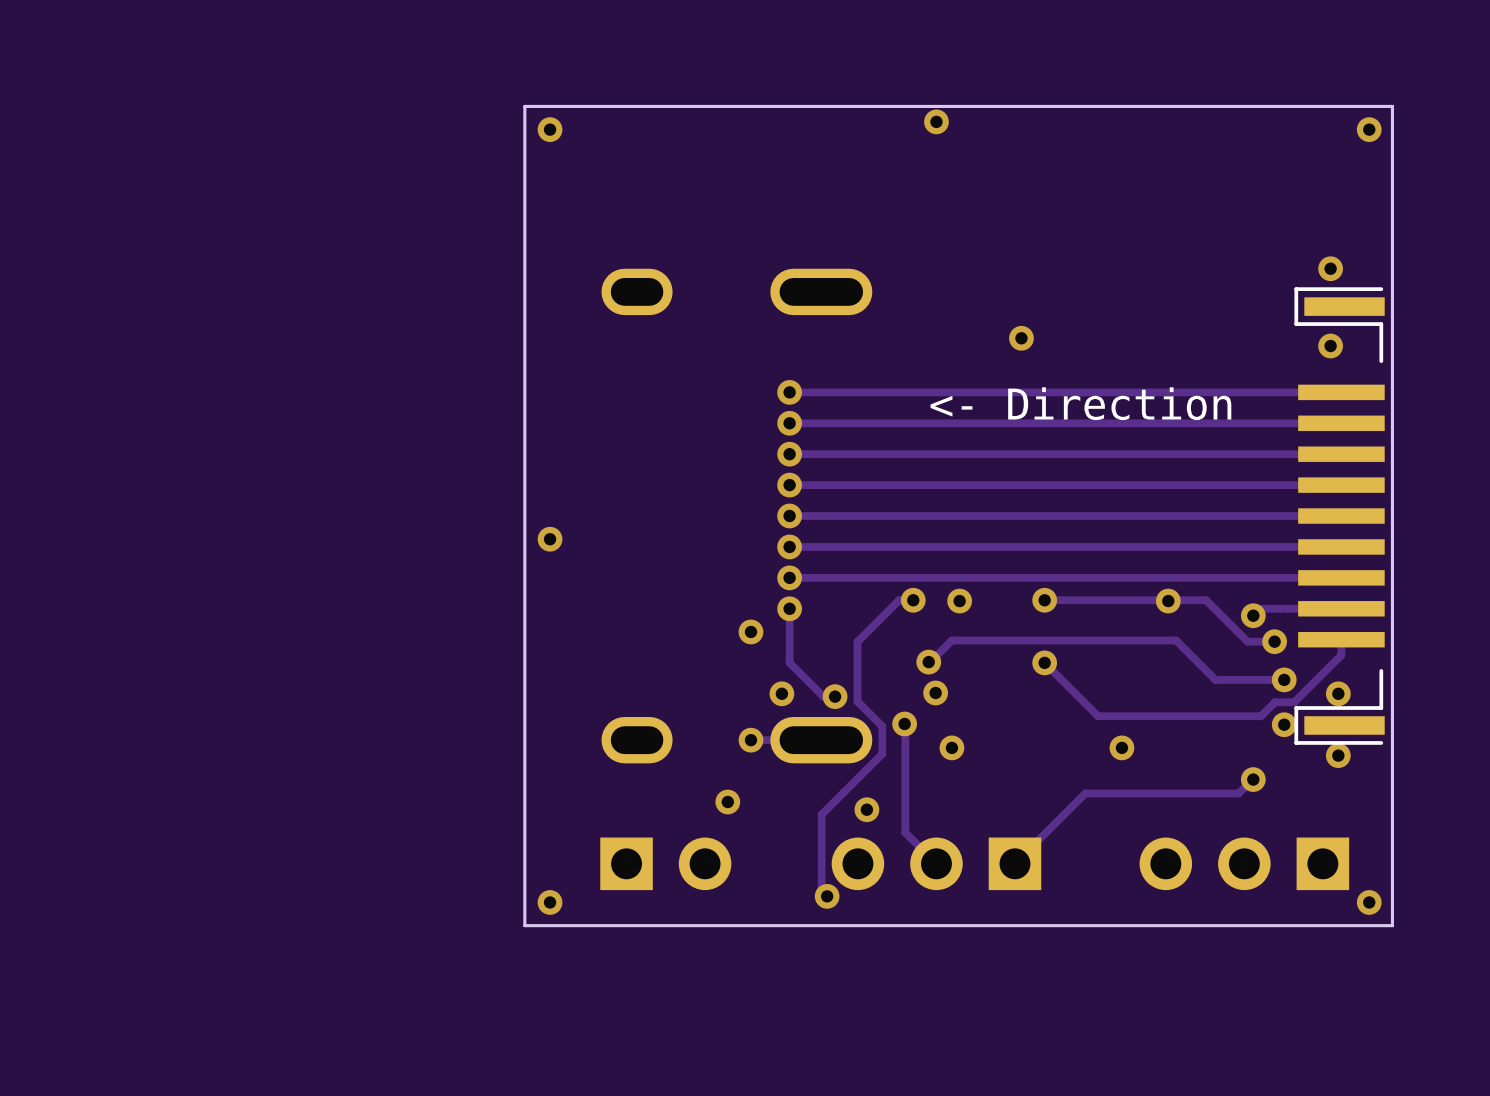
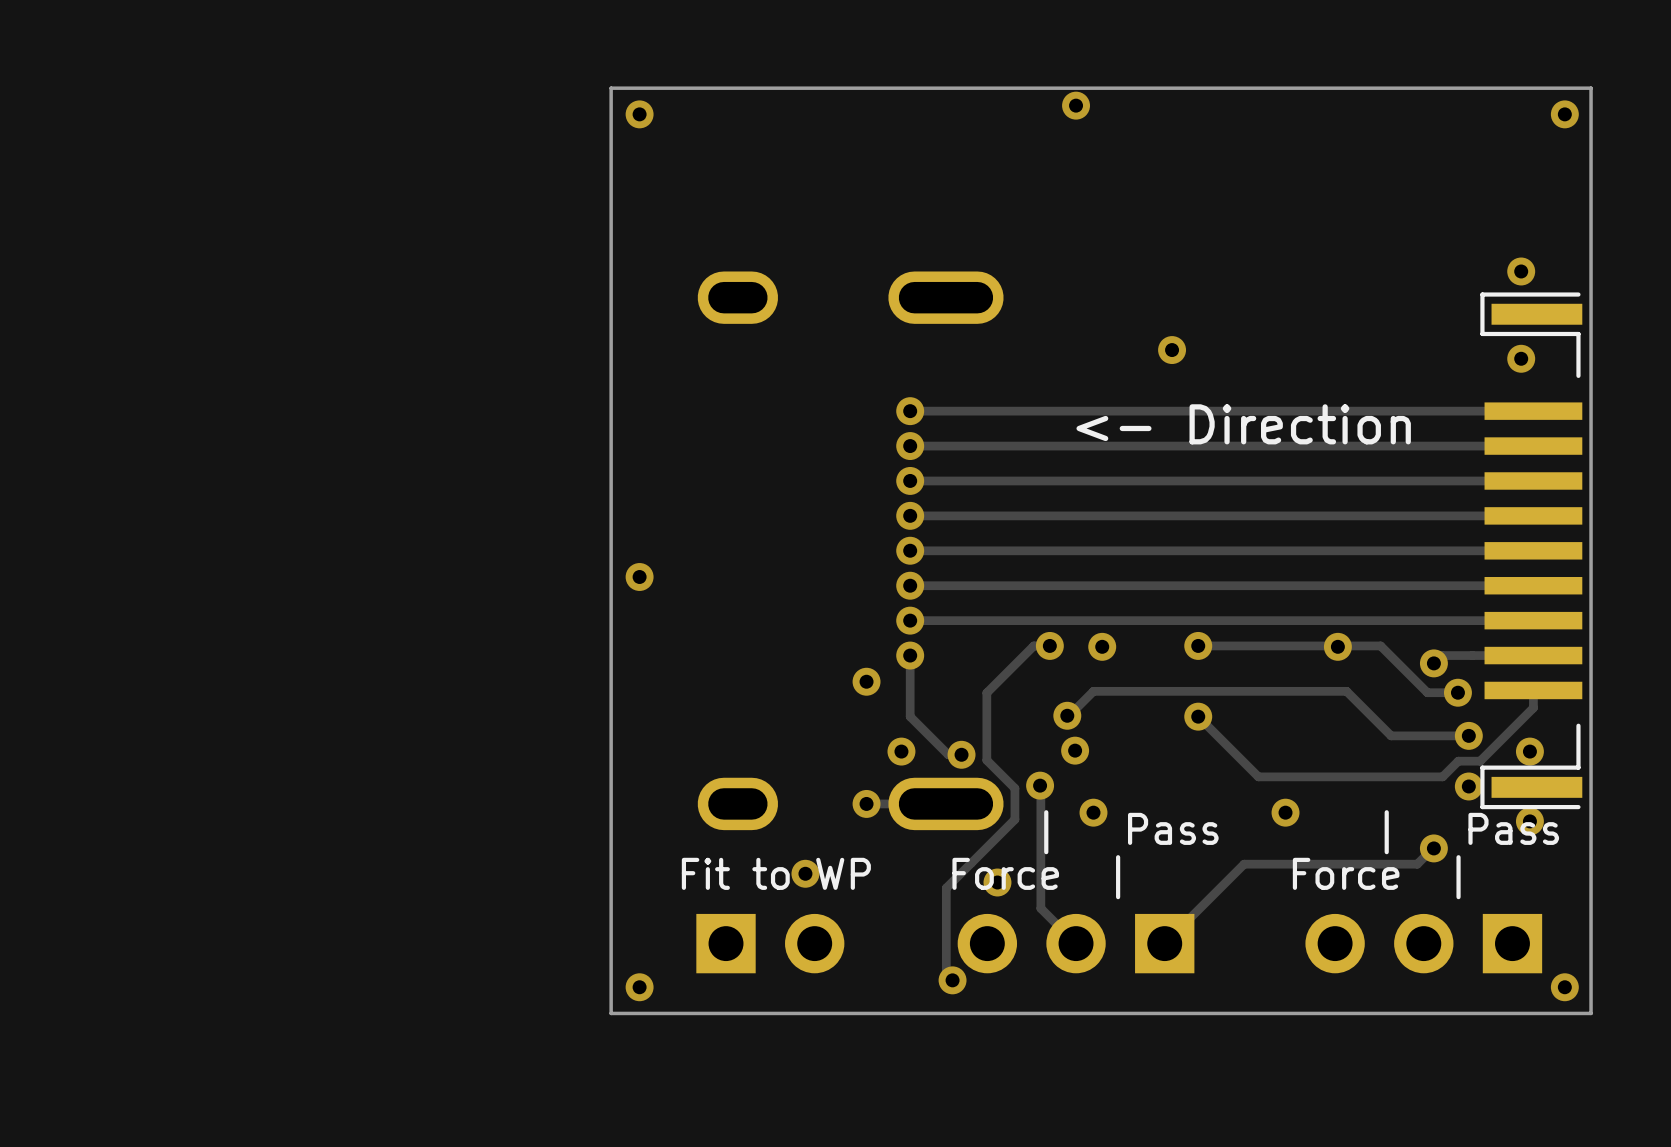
text: none -> | Pass (1131, 832)
text: none -> | Pass (1471, 832)
text: none -> Fit to WP (776, 873)
via position: (727, 801) -> (805, 873)
text: none -> Force | (1036, 877)
text: none -> Force | (1376, 877)

